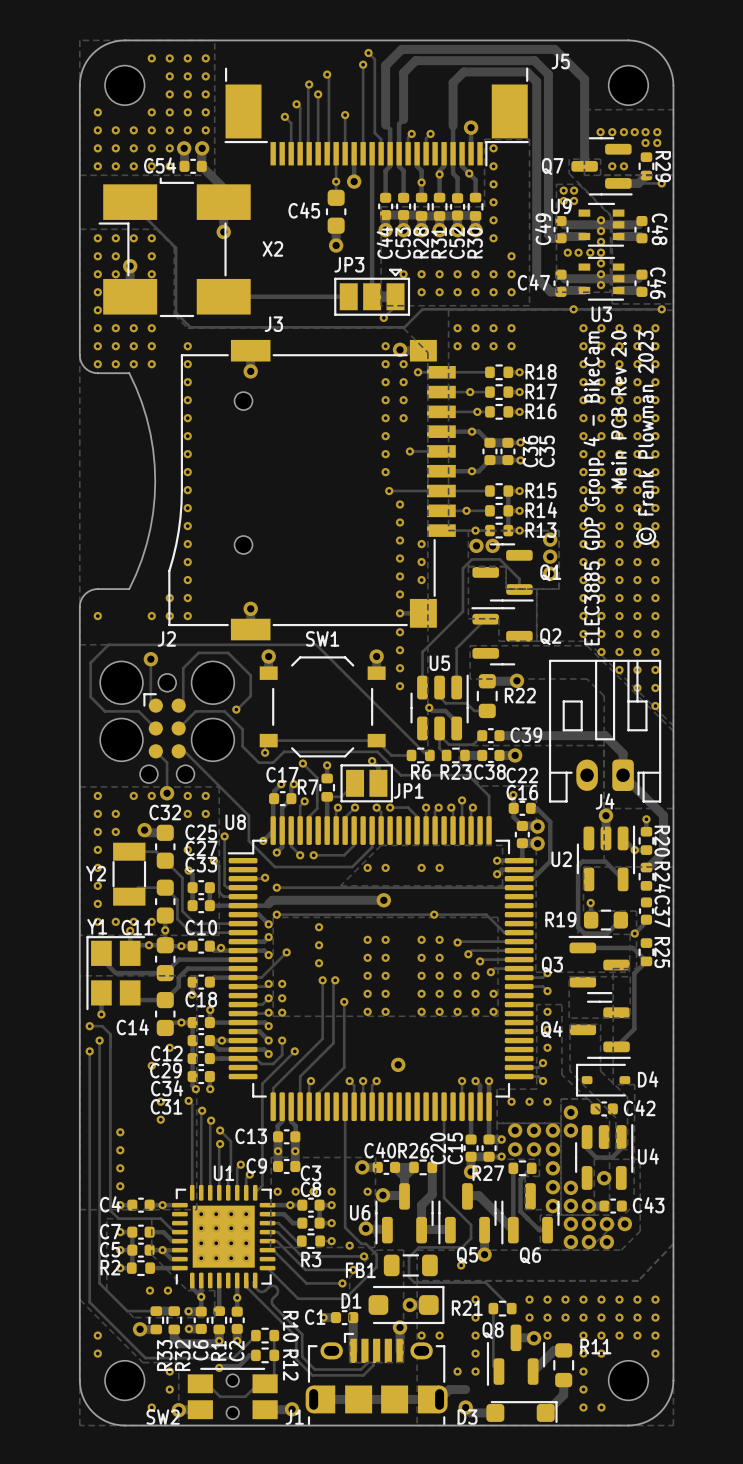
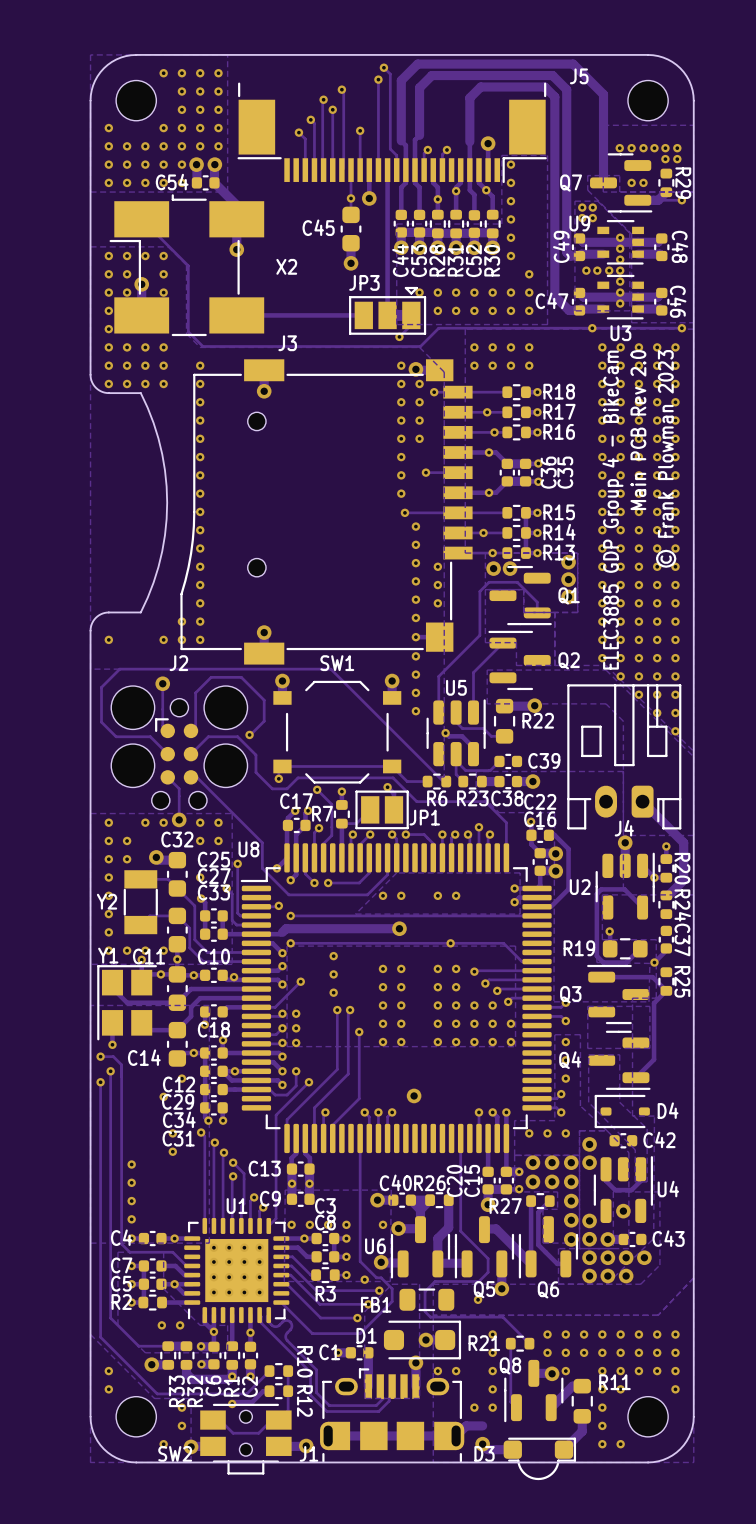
track: (499, 735) (605, 735) (623, 753) (623, 775) -> none
SW2 footprint: [187, 1367, 278, 1420] -> [200, 1403, 292, 1475]
D3 footprint: [486, 1401, 558, 1424] -> [503, 1437, 577, 1481]

